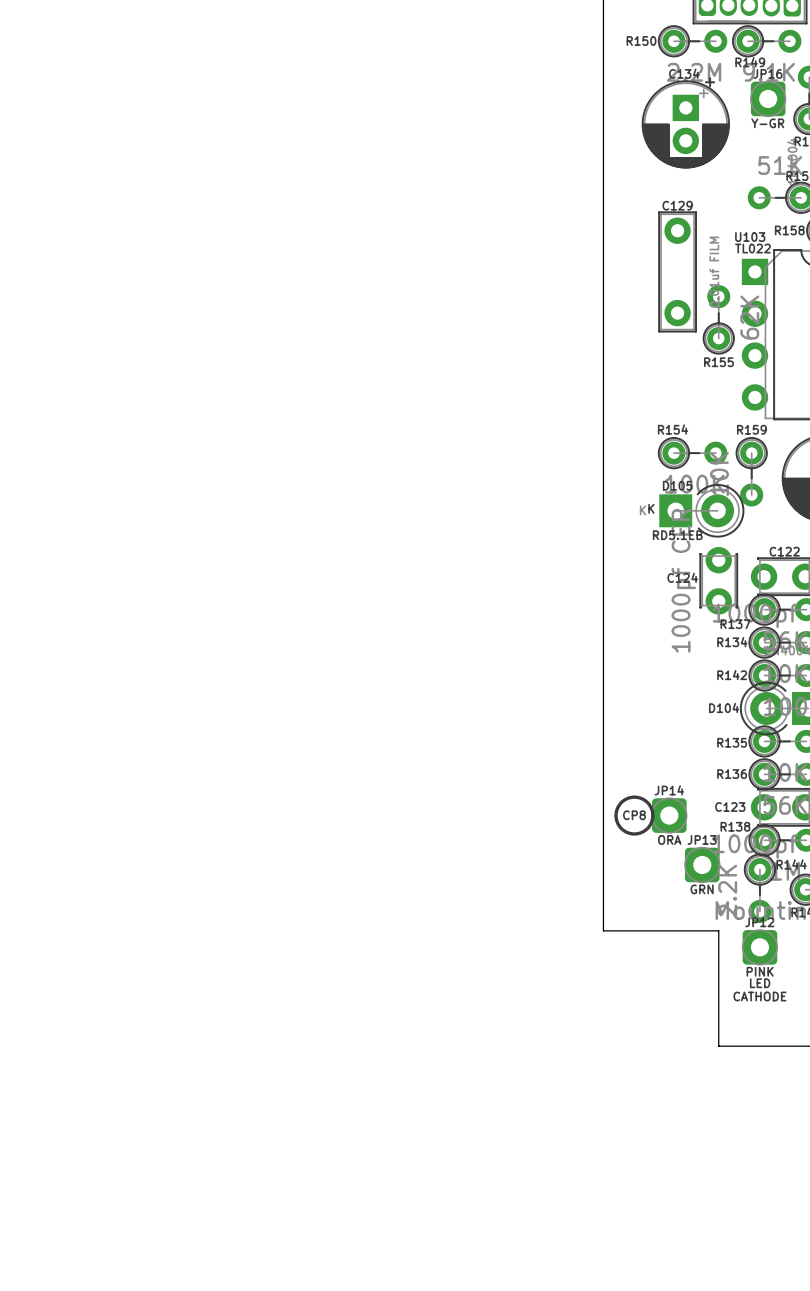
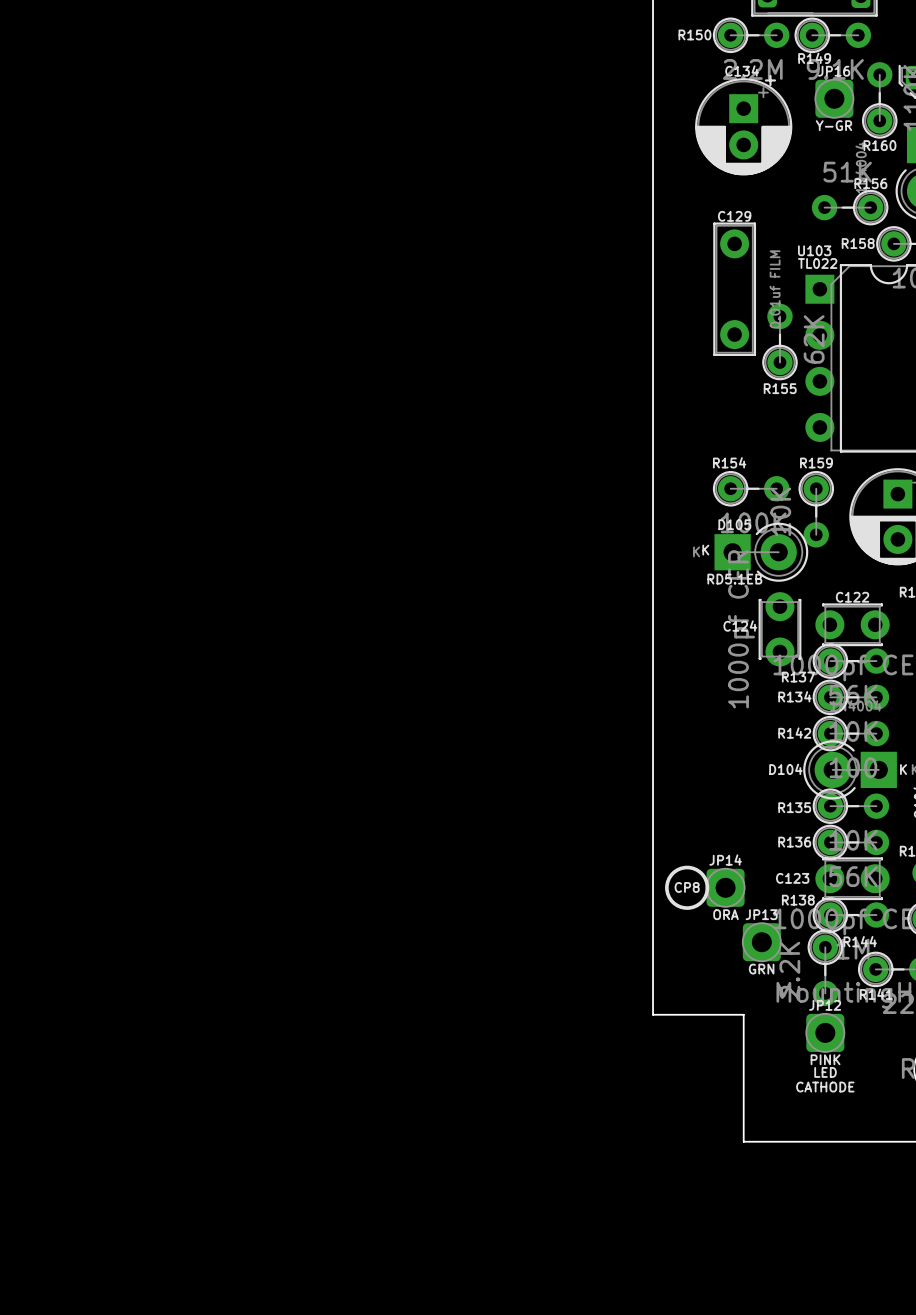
board edge: (685, 930) (718, 930) (718, 1046) -> (743, 1014) (743, 1141) (779, 1141)

